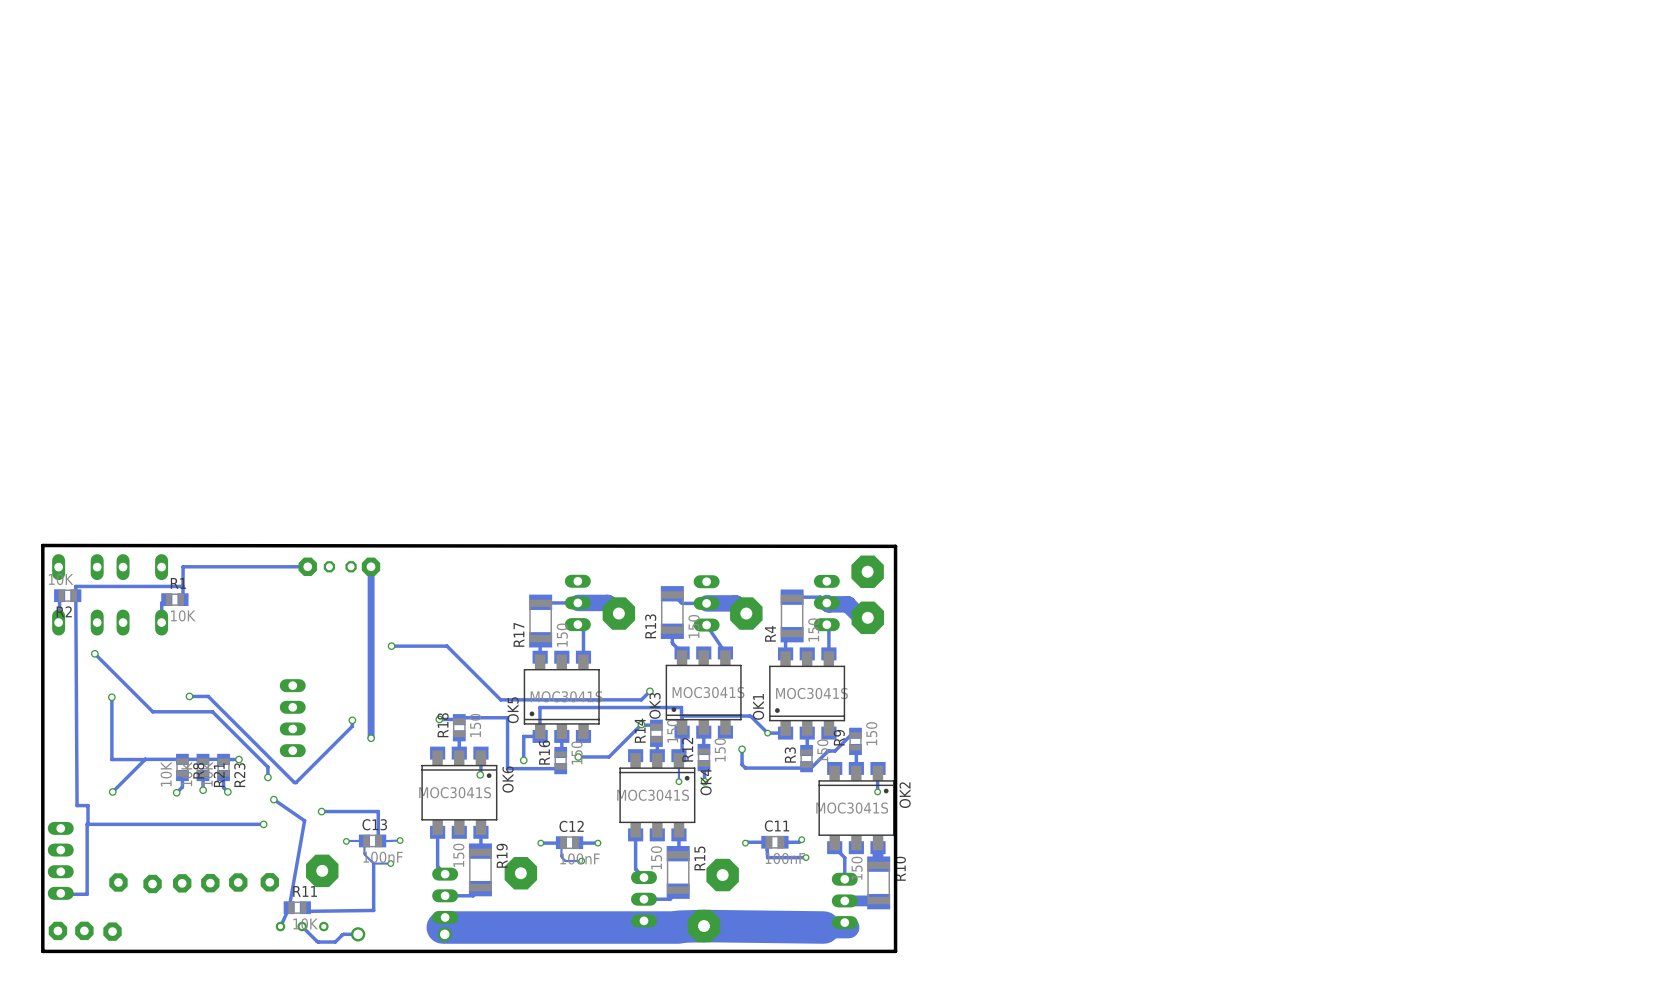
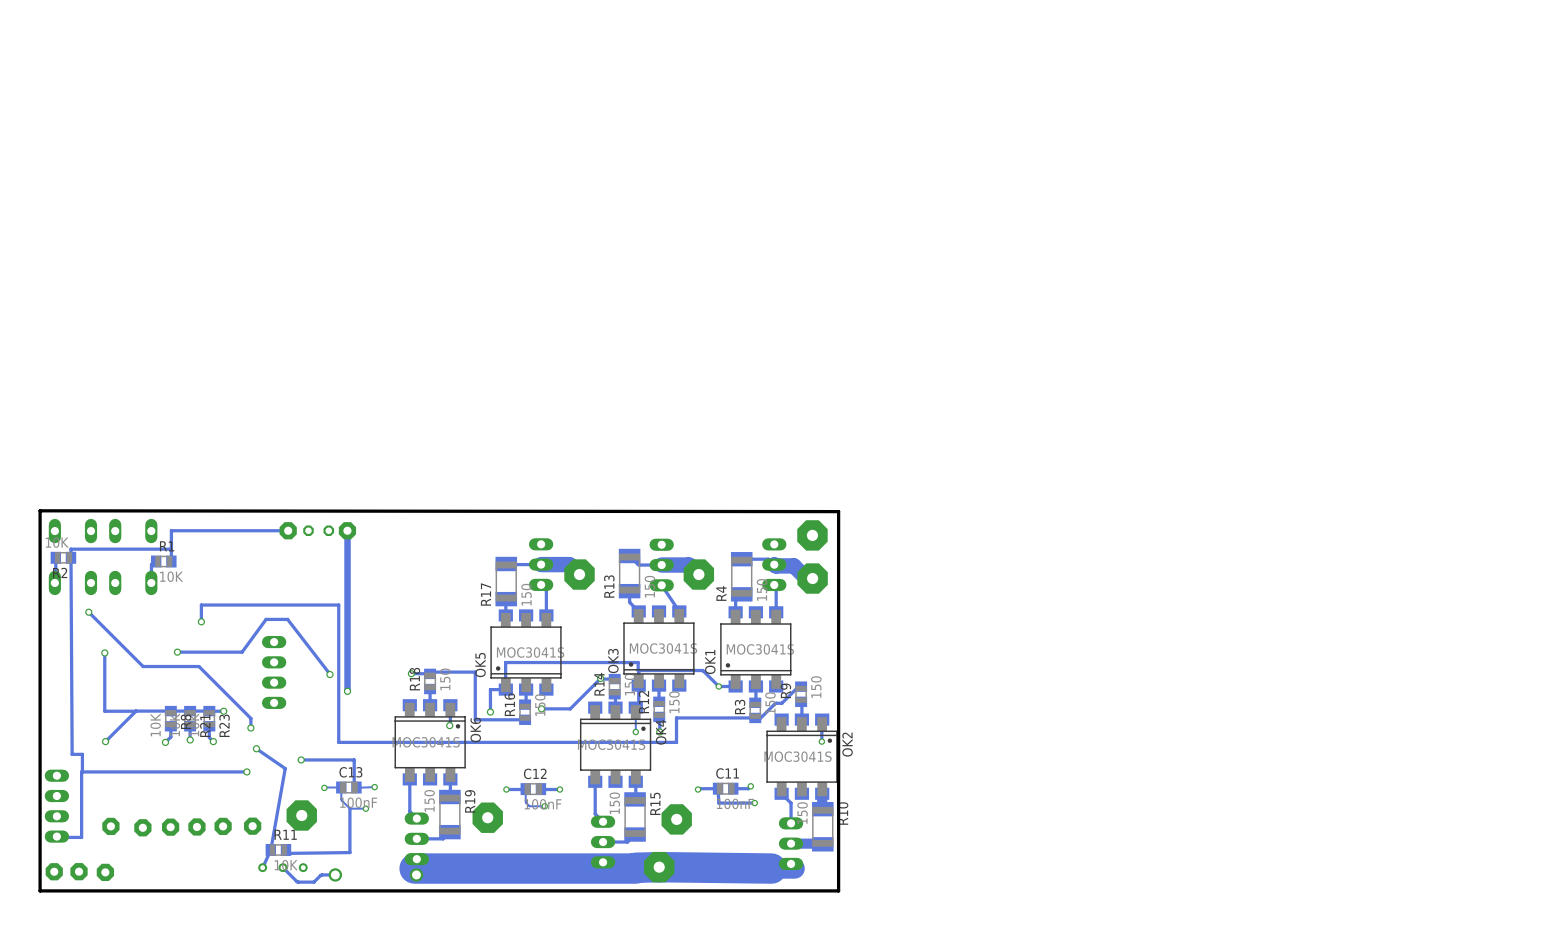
track: (391, 646) (447, 646) (500, 699) (641, 699) (649, 691) -> none
via: (391, 646) -> none
via: none -> (201, 621)
via: (649, 691) -> none
track: (208, 696) (294, 782) (352, 726) (352, 720) -> (195, 652) (242, 652) (266, 619) (287, 619) (329, 674)
track: (742, 749) (742, 764) (745, 768) (806, 766) -> (201, 621) (201, 605) (338, 605) (338, 742) (676, 742) (676, 717) (755, 717)
via: (742, 749) -> none

